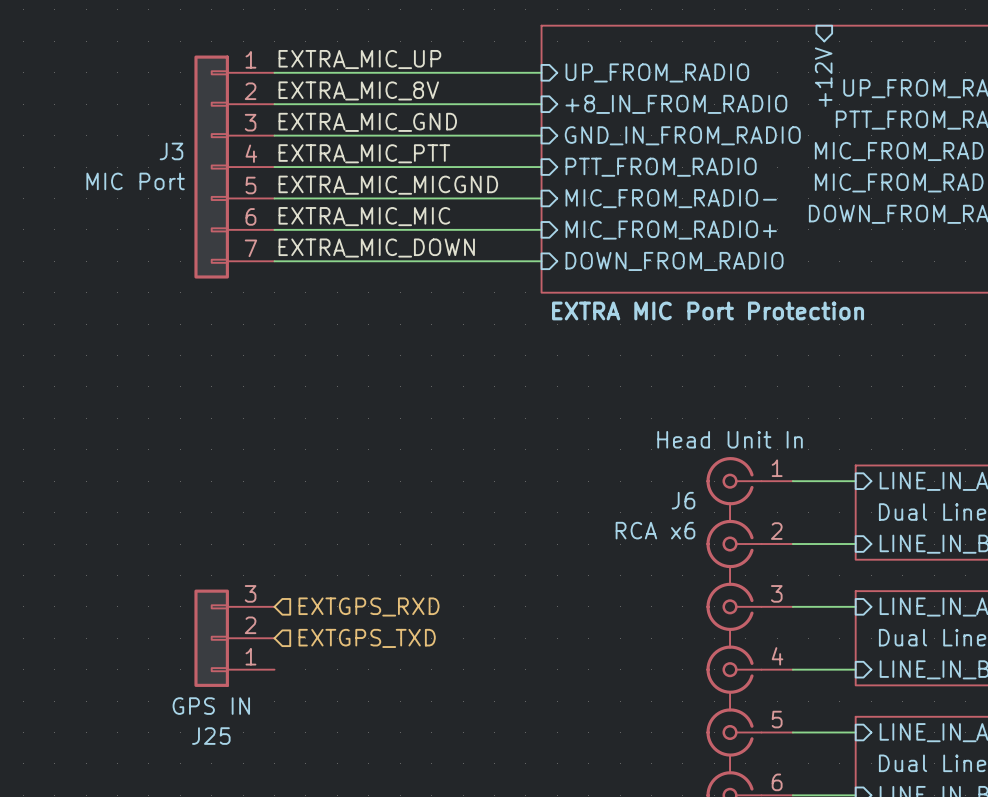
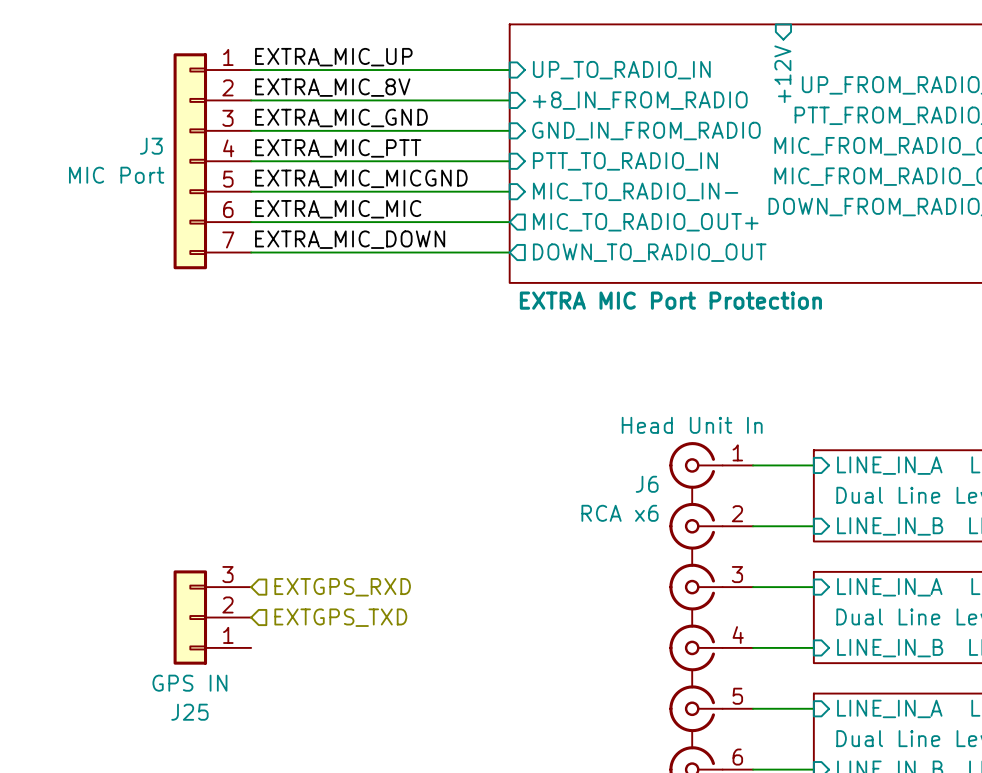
sheet pin: UP_FROM_RADIO (657, 72) -> UP_TO_RADIO_IN (621, 70)
sheet pin: PTT_FROM_RADIO (661, 167) -> PTT_TO_RADIO_IN (625, 161)
sheet pin: MIC_FROM_RADIO- (671, 198) -> MIC_TO_RADIO_IN- (635, 191)
sheet pin shape: input (671, 230) -> output (645, 222)
sheet pin: MIC_FROM_RADIO+ (671, 230) -> MIC_TO_RADIO_OUT+ (645, 222)
sheet pin shape: input (674, 261) -> output (649, 252)
sheet pin: DOWN_FROM_RADIO (674, 261) -> DOWN_TO_RADIO_OUT (649, 252)

